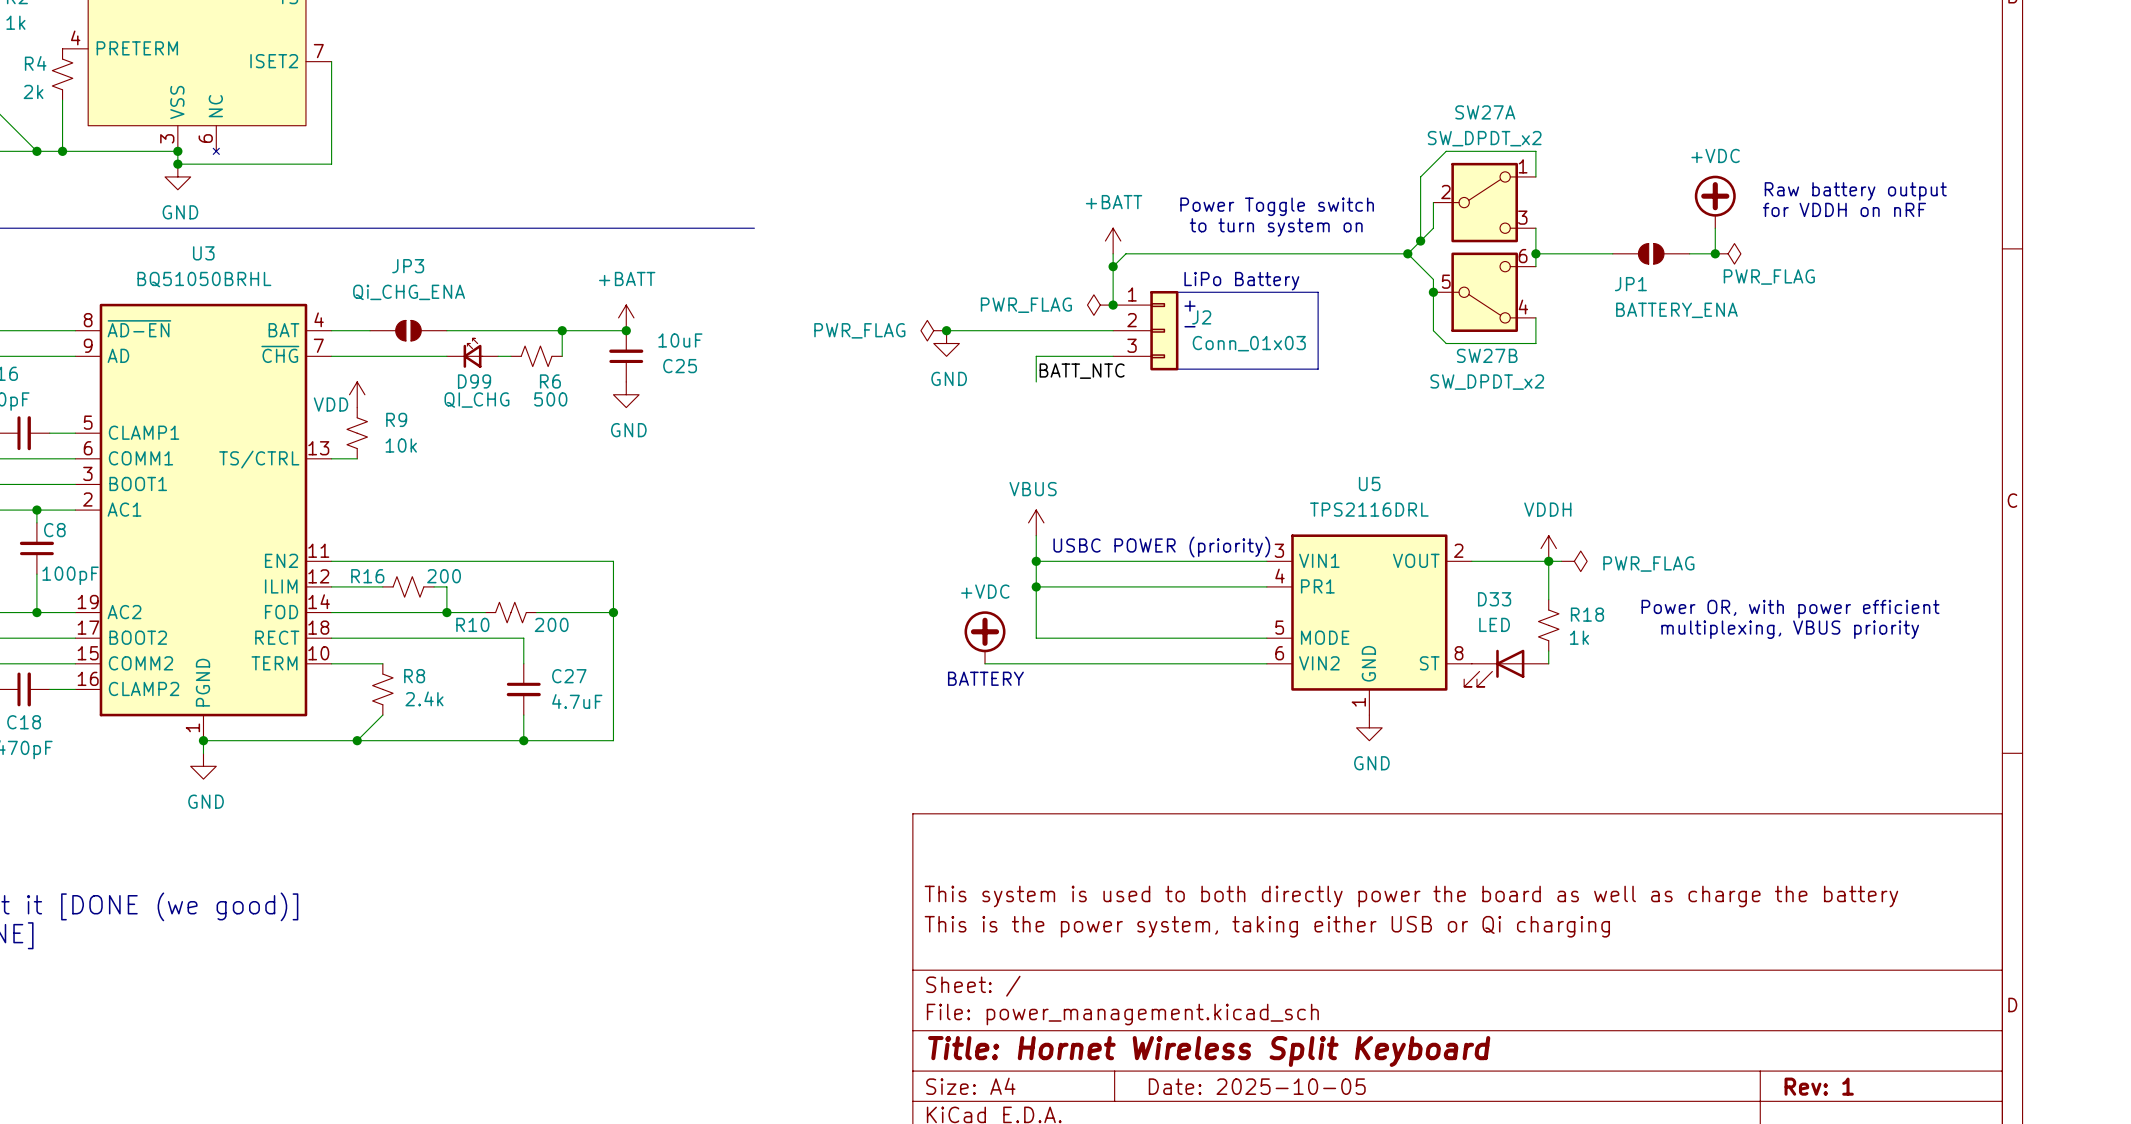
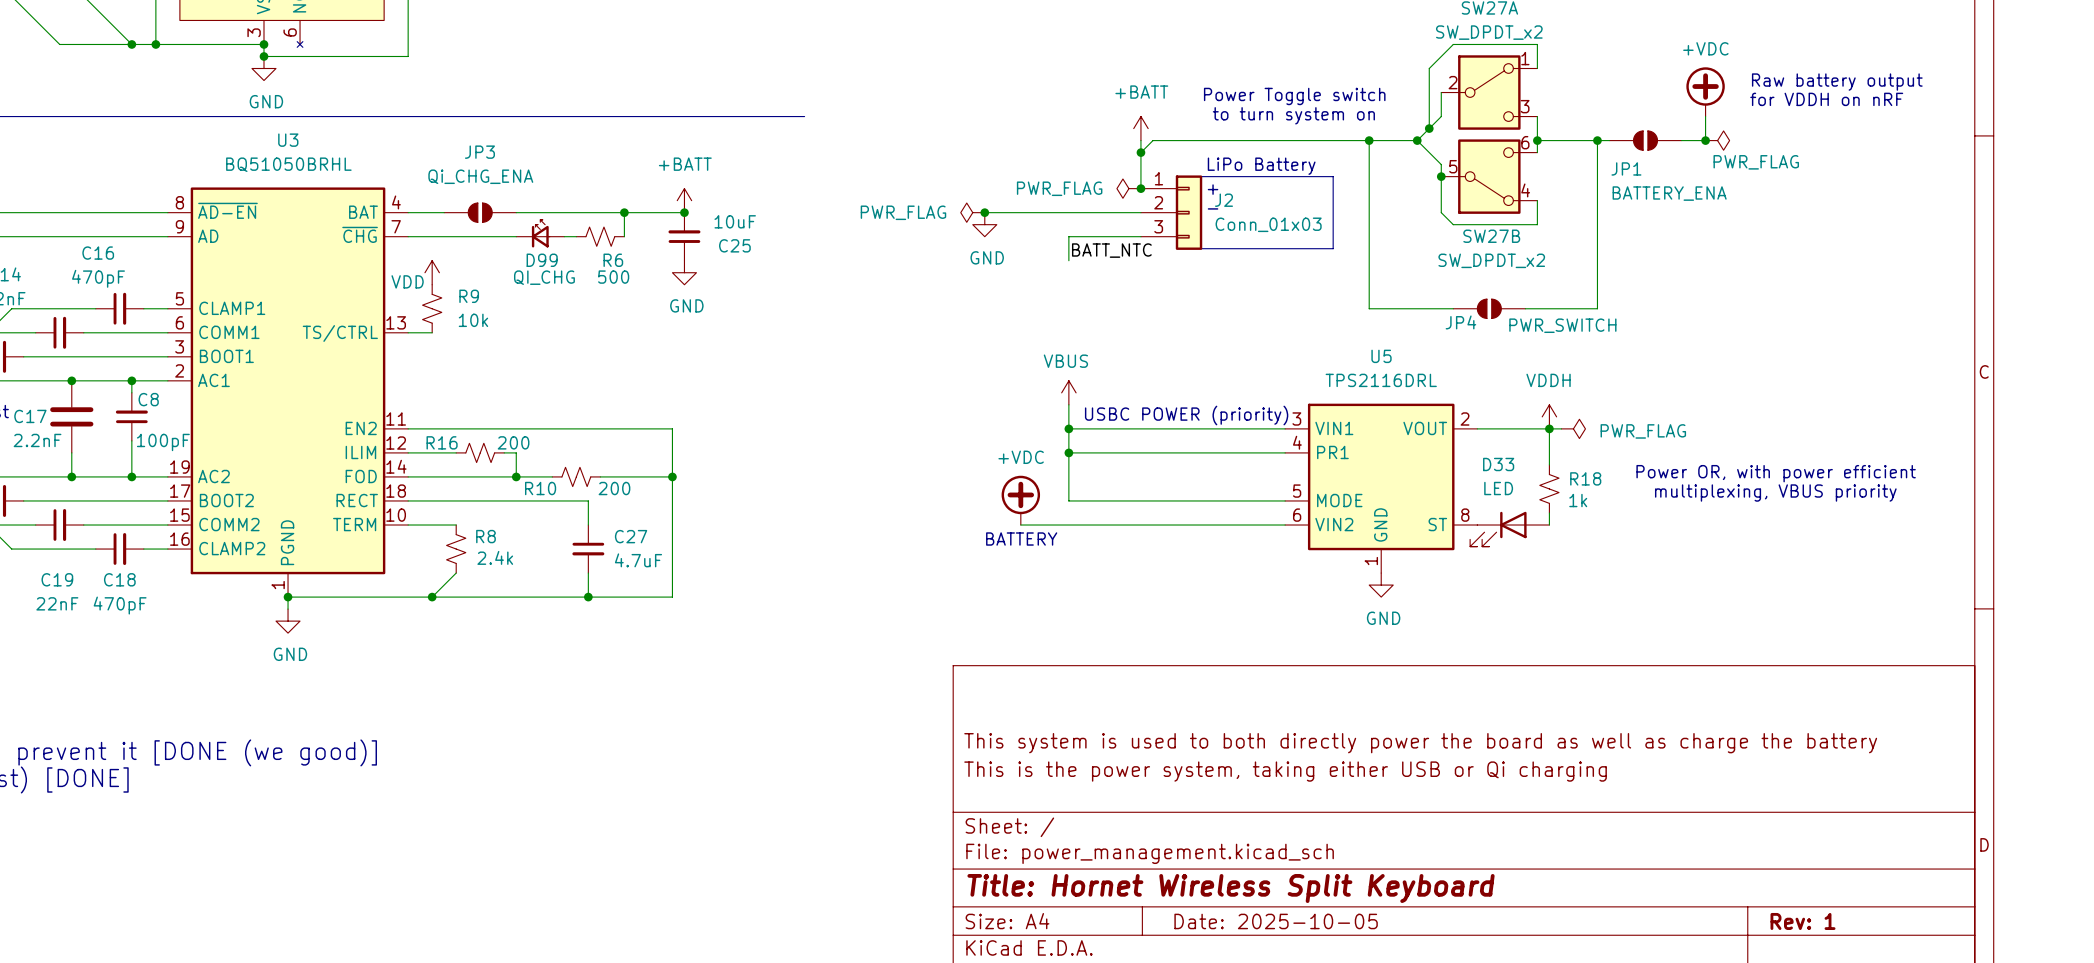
wire: none -> (1369, 140) (1369, 308) (1453, 308)
junction: none -> (1369, 140)
wire: none -> (1597, 140) (1597, 308) (1525, 308)
junction: none -> (1597, 140)
JP4: none -> PWR_SWITCH (1489, 308)

